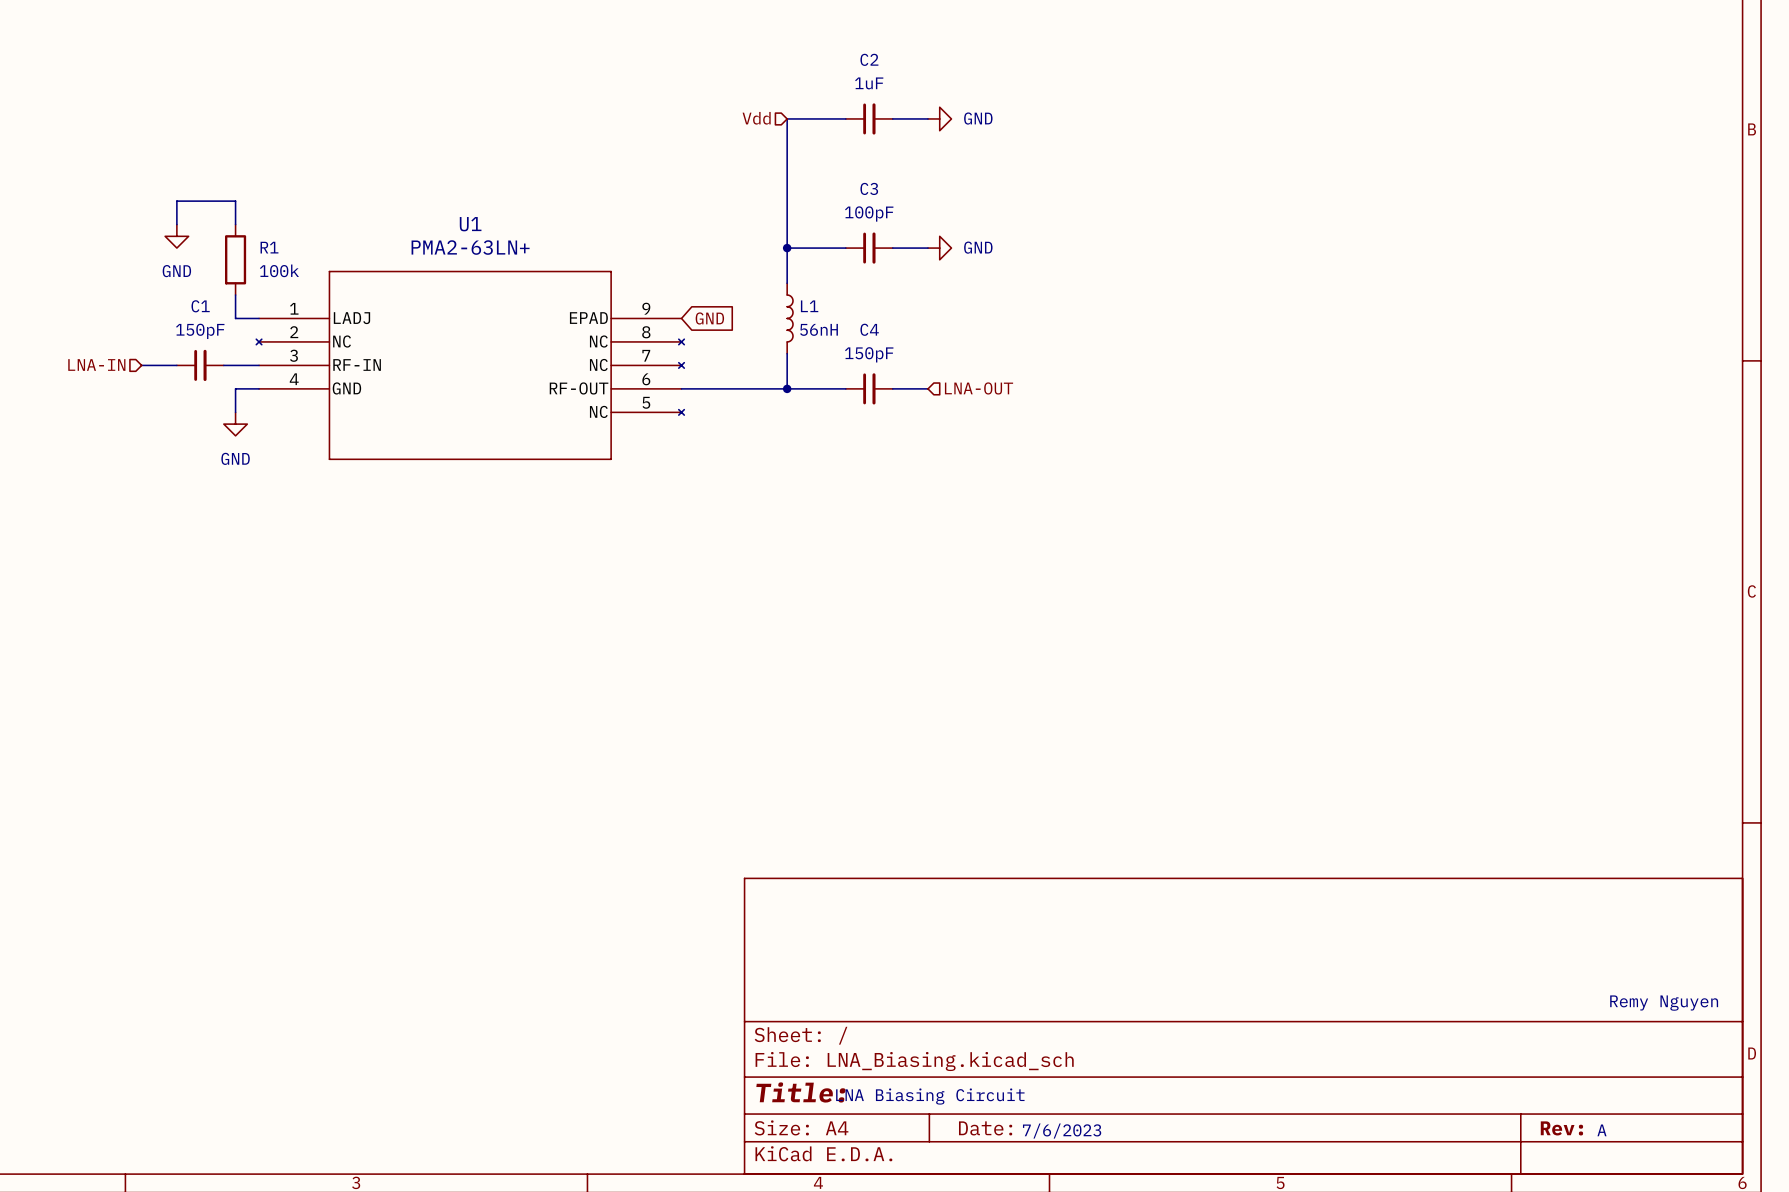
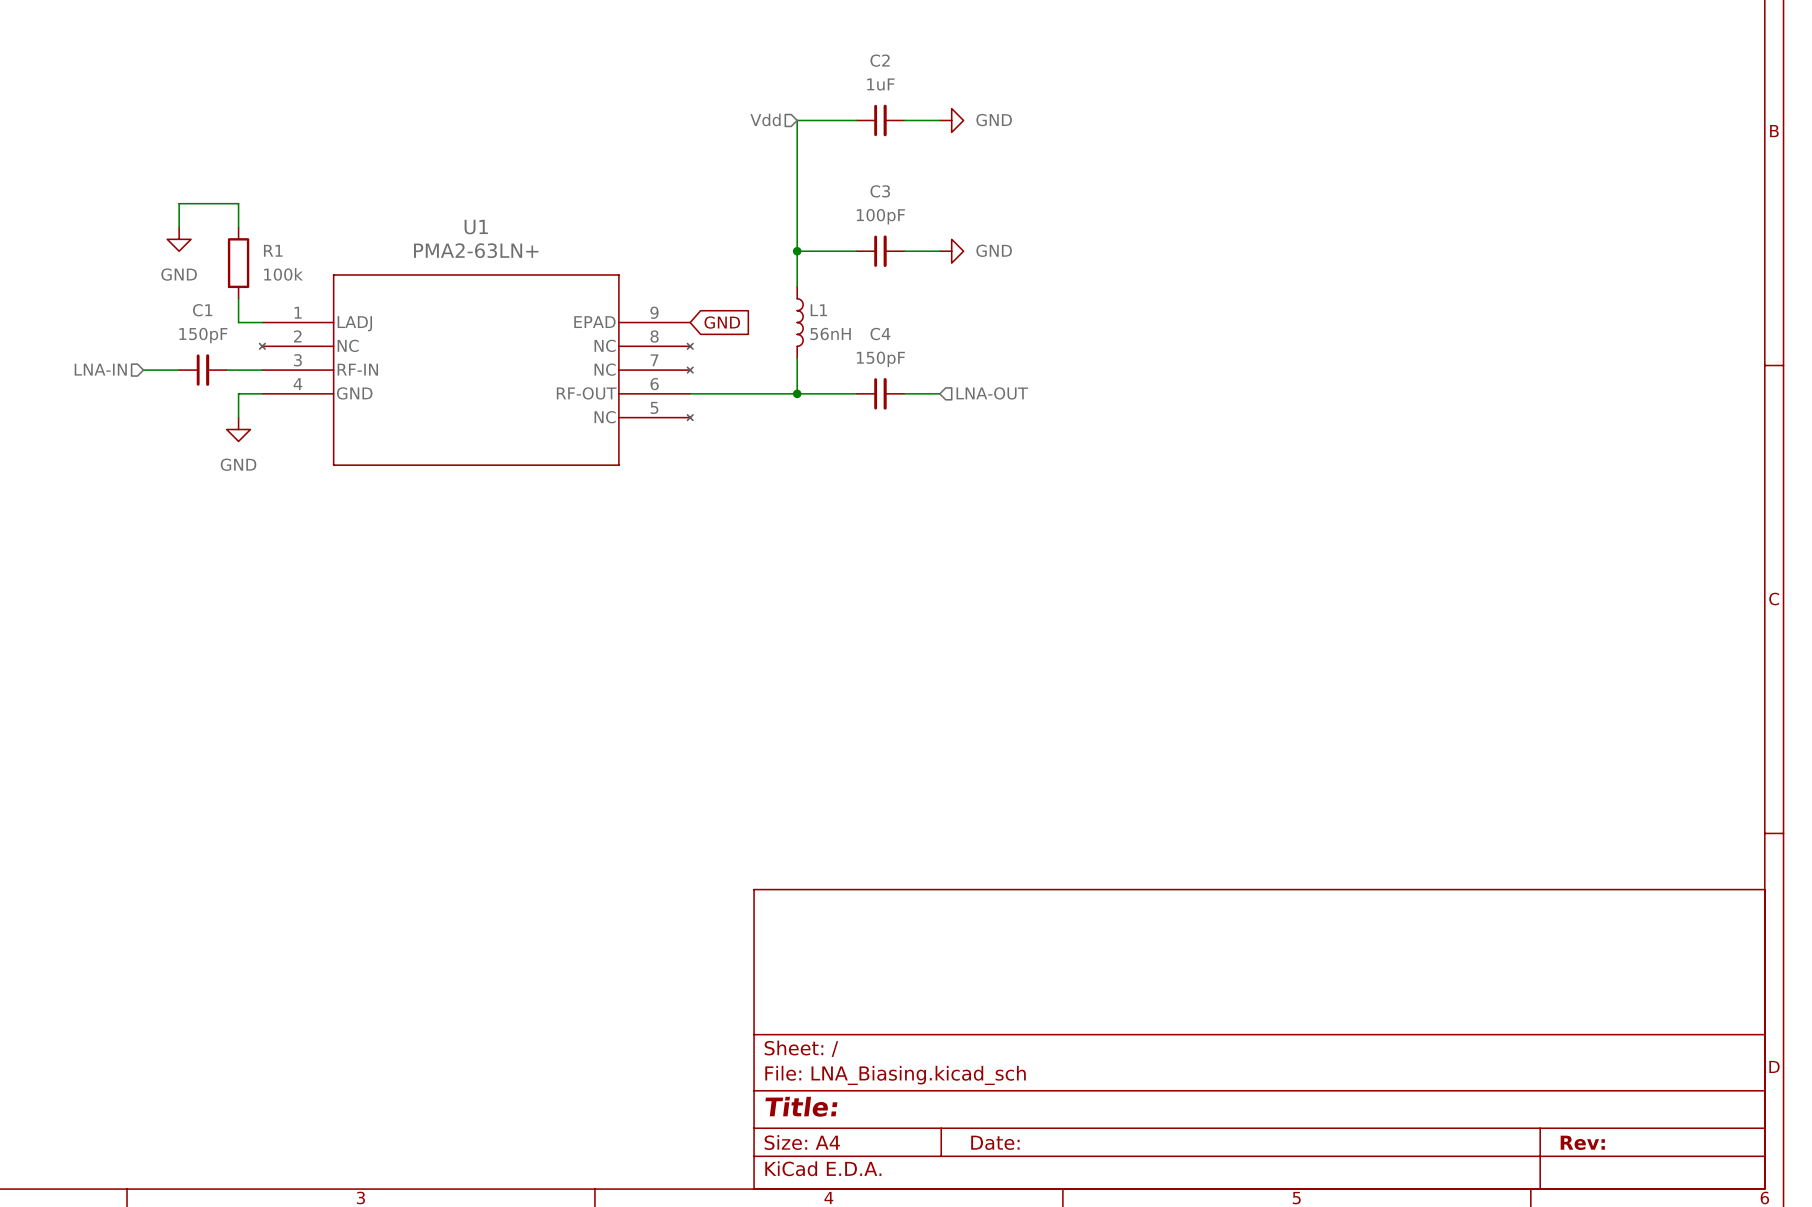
text: Remy Nguyen (1664, 1003) -> none
text: LNA Biasing Circuit (930, 1096) -> none
text: A (1601, 1130) -> none
text: 7/6/2023 (1062, 1131) -> none

